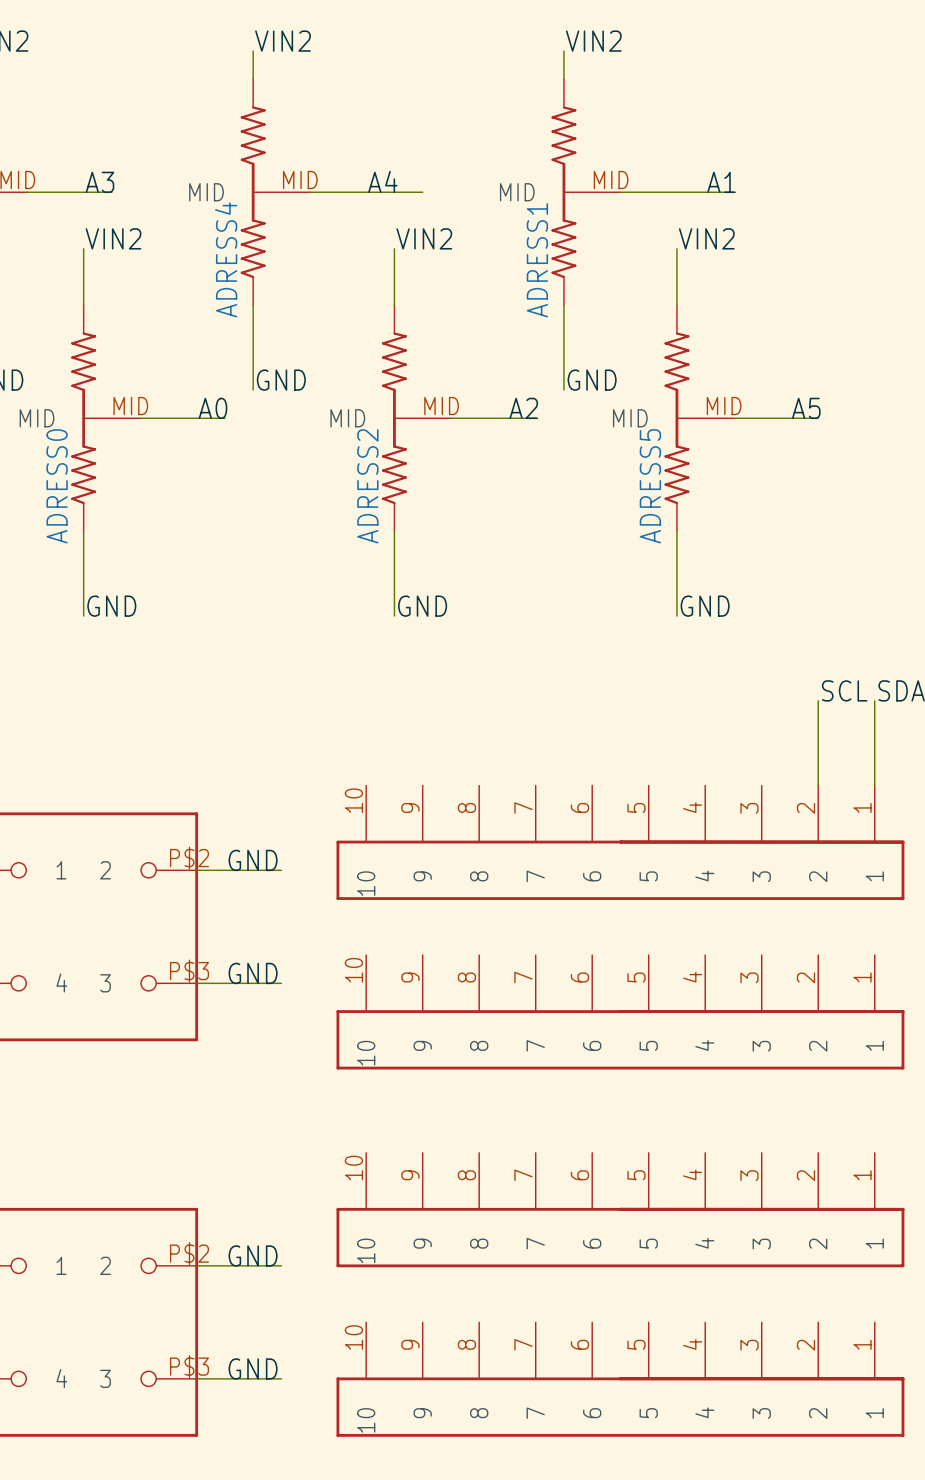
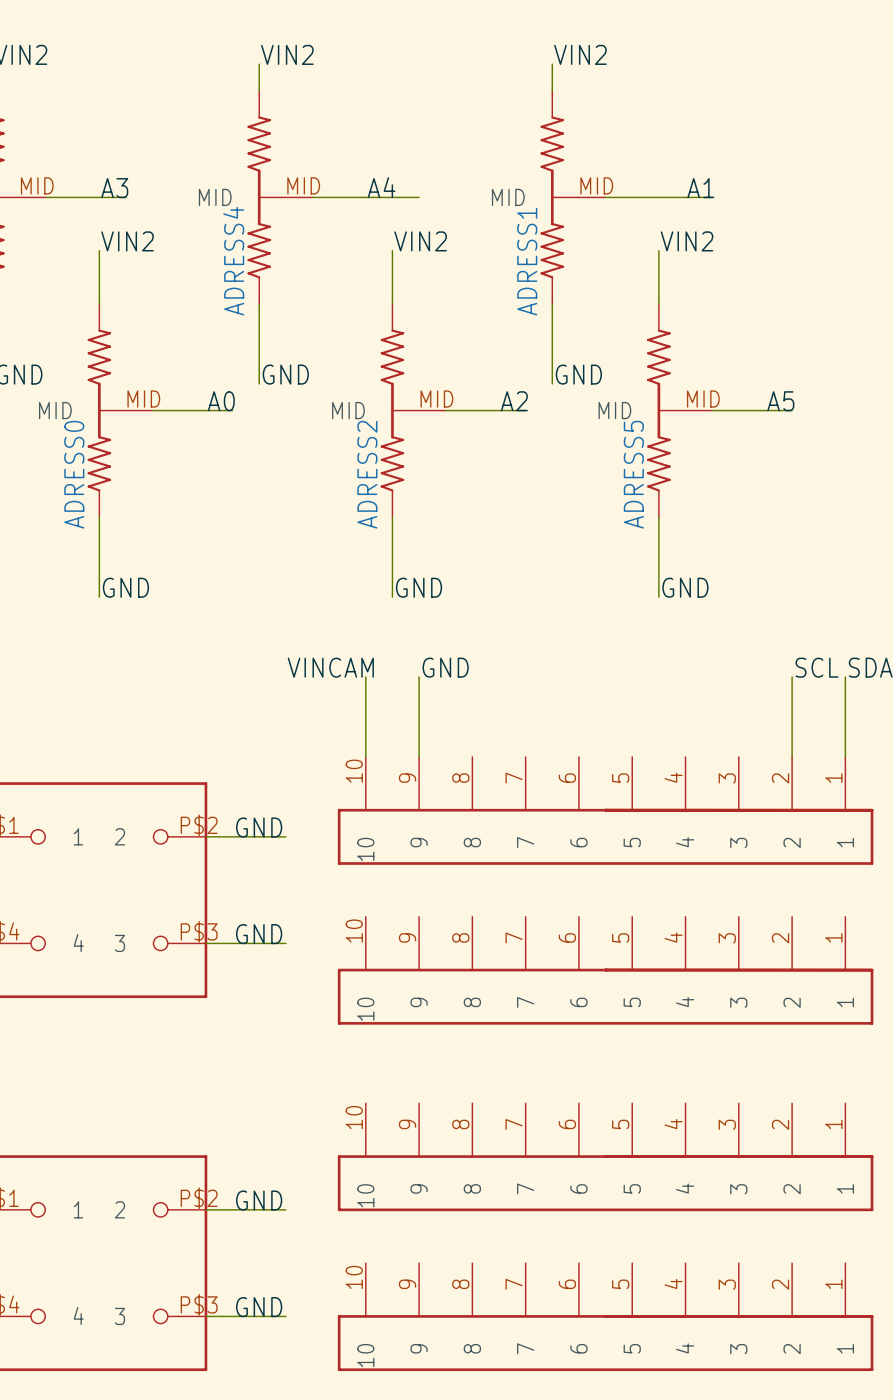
label: none -> VINCAM (330, 667)
label: none -> GND (445, 667)
wire: none -> (365, 677) (365, 756)
wire: none -> (419, 677) (419, 756)

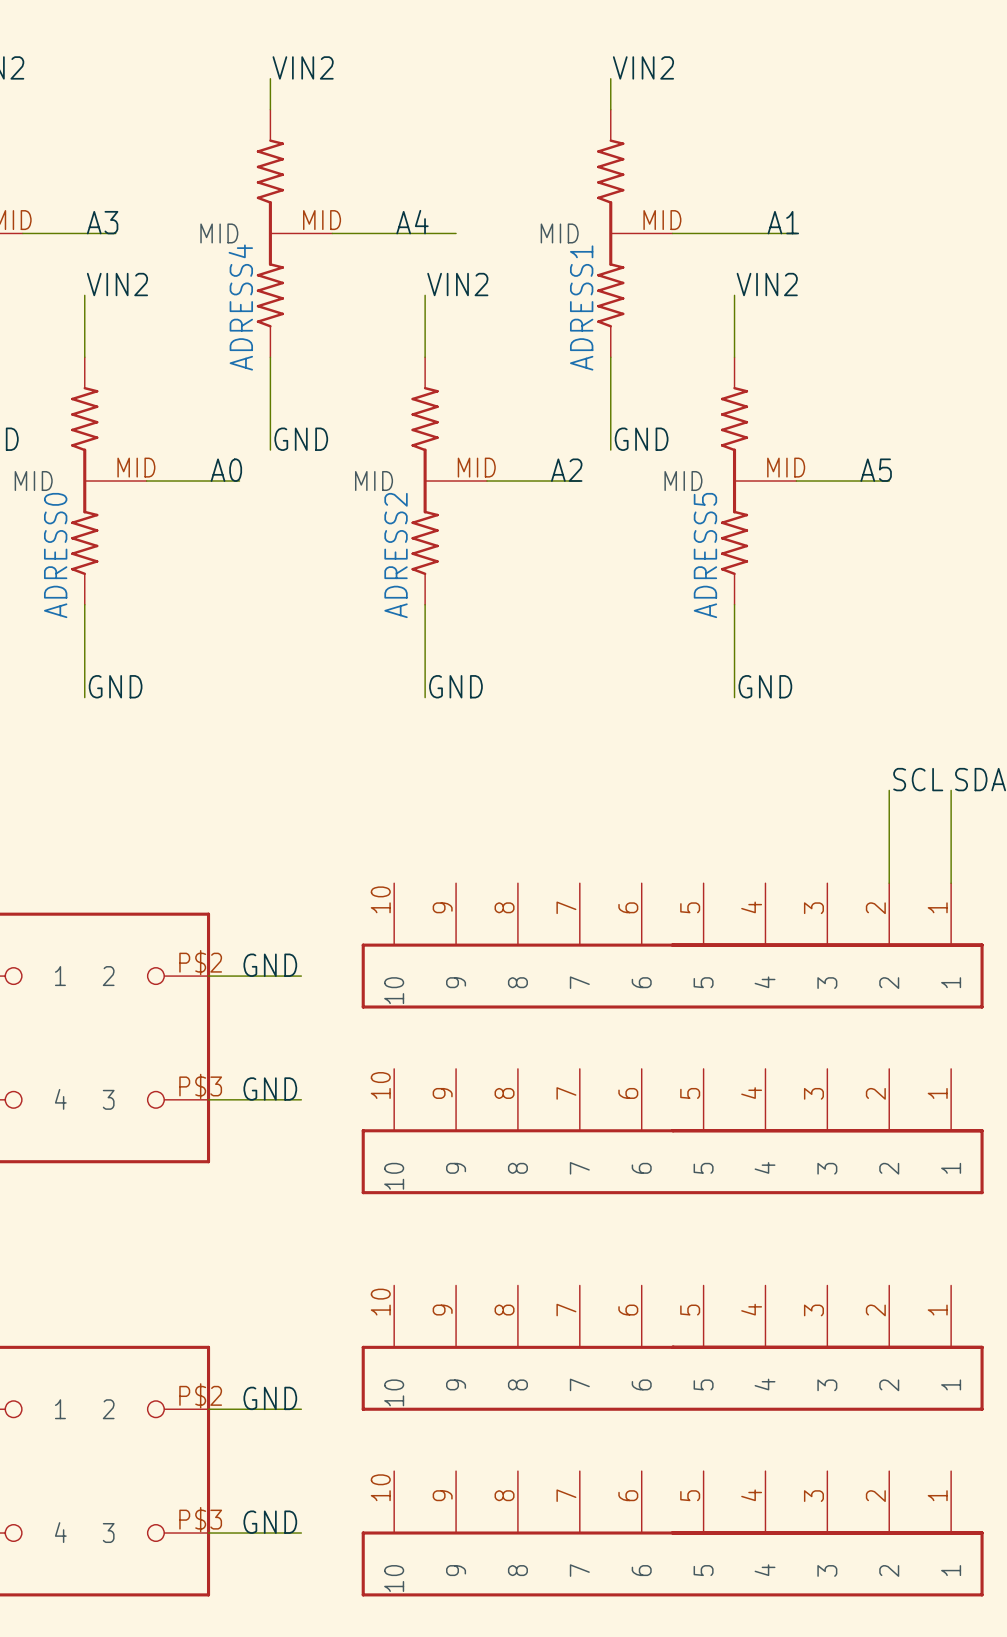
label: VINCAM (330, 667) -> none
label: GND (445, 667) -> none
wire: (365, 677) (365, 756) -> none
wire: (419, 677) (419, 756) -> none

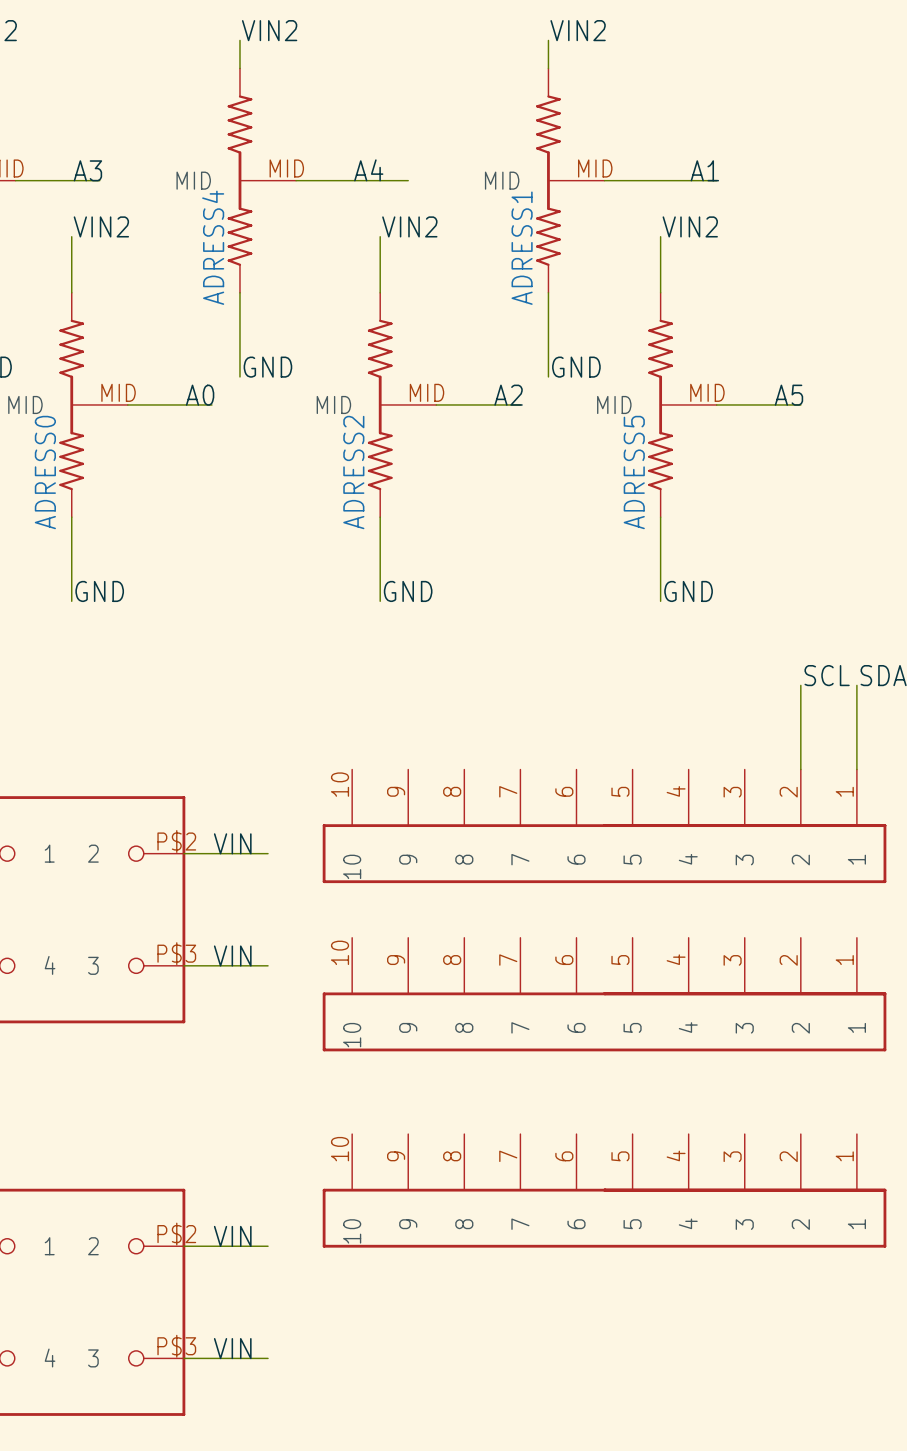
label: GND (270, 965) -> VIN (232, 843)
label: GND (270, 1089) -> VIN (232, 956)
label: GND (270, 1398) -> VIN (232, 1236)
label: GND (270, 1522) -> VIN (232, 1348)
part: (672, 1533) -> none

